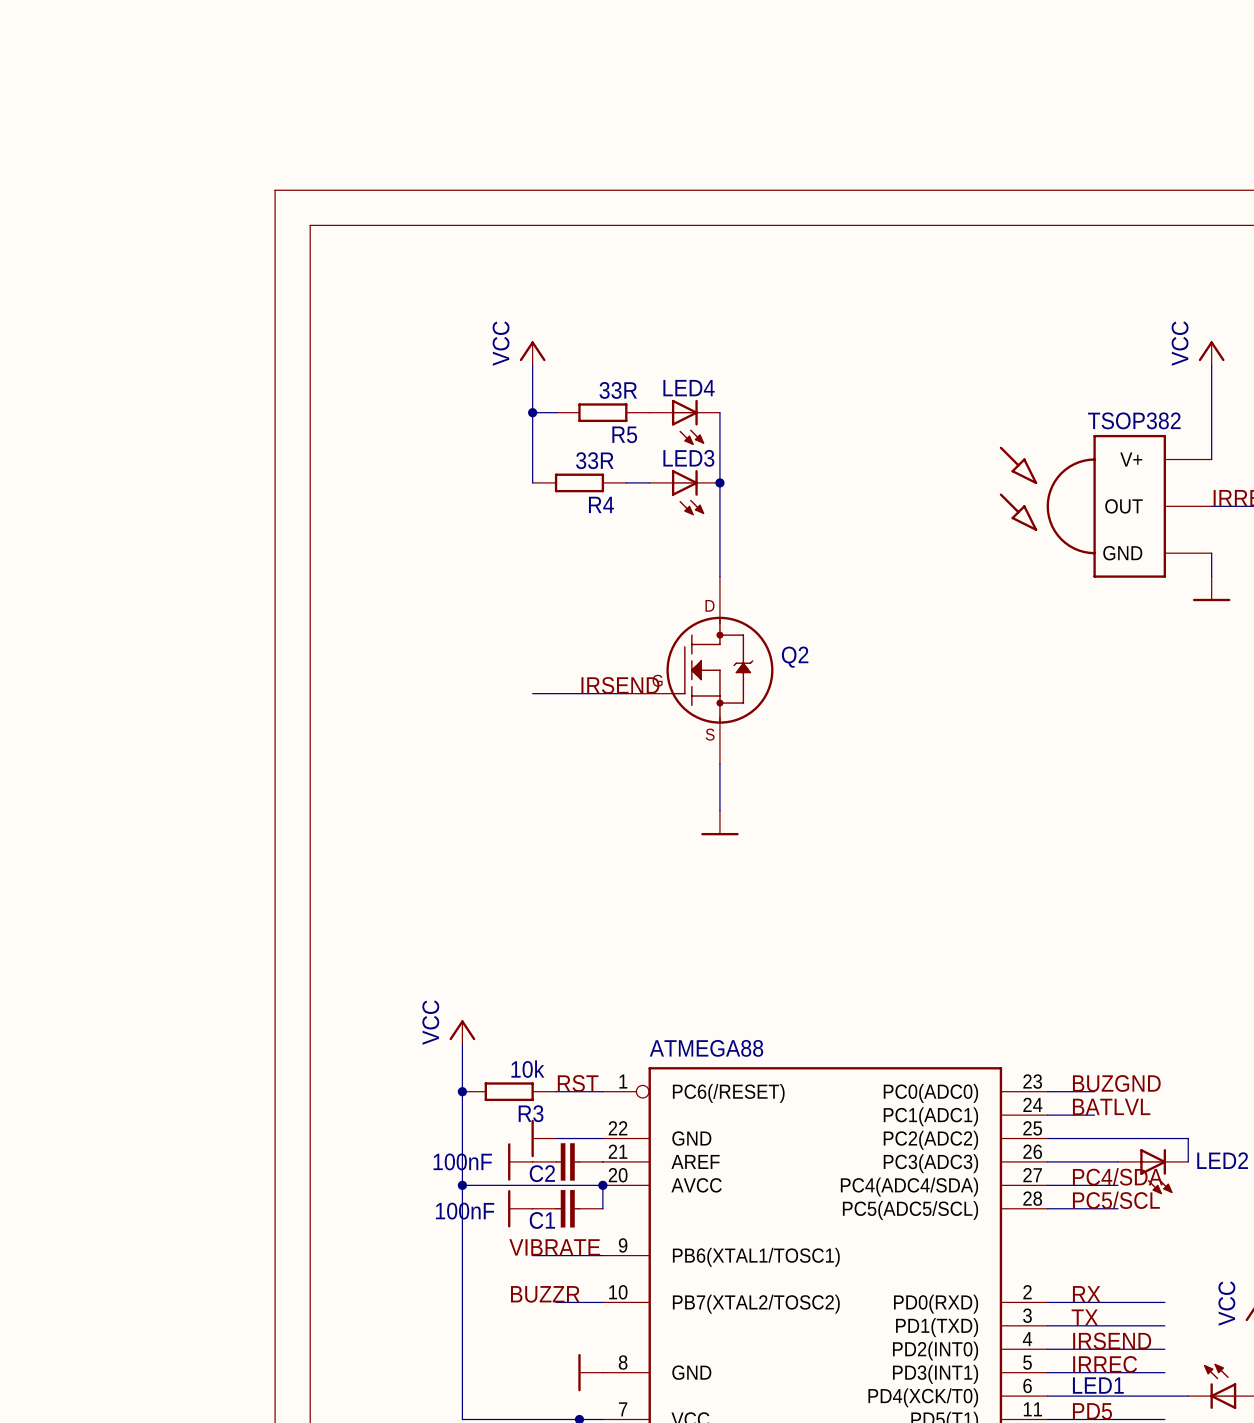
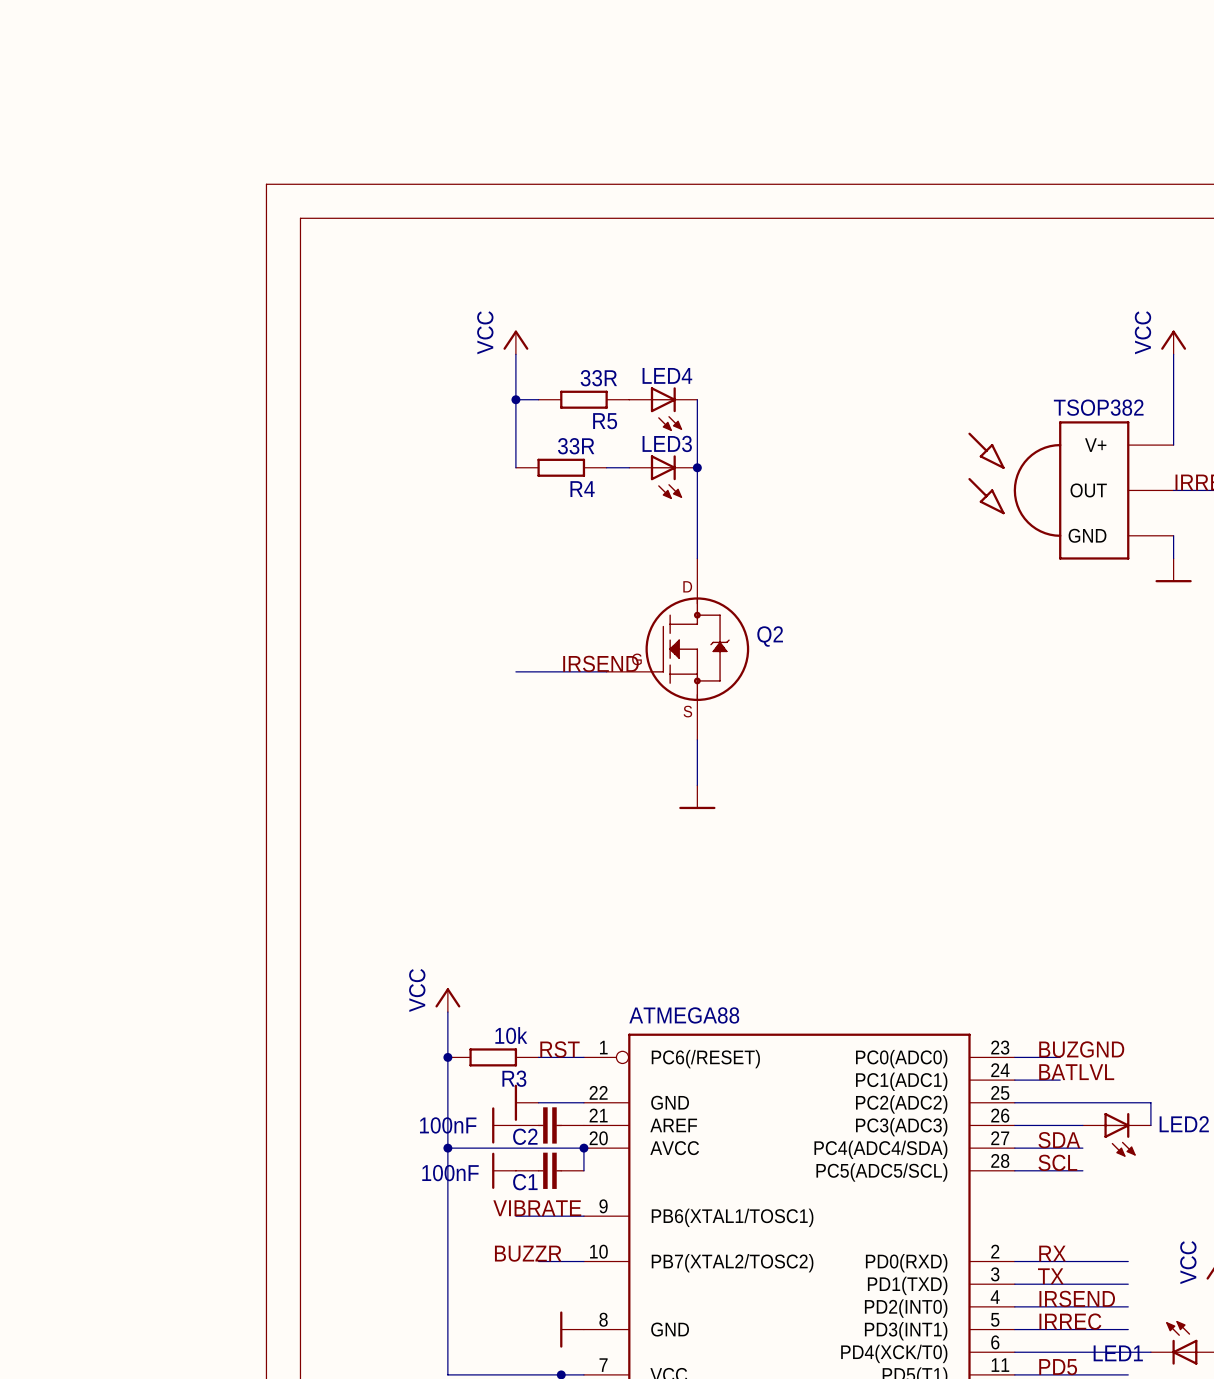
label: PC4/SDA (1117, 1176) -> SDA (1059, 1140)
label: PC5/SCL (1116, 1200) -> SCL (1057, 1162)
LED1 name position: LED1 (1098, 1385) -> LED1 (1118, 1353)

